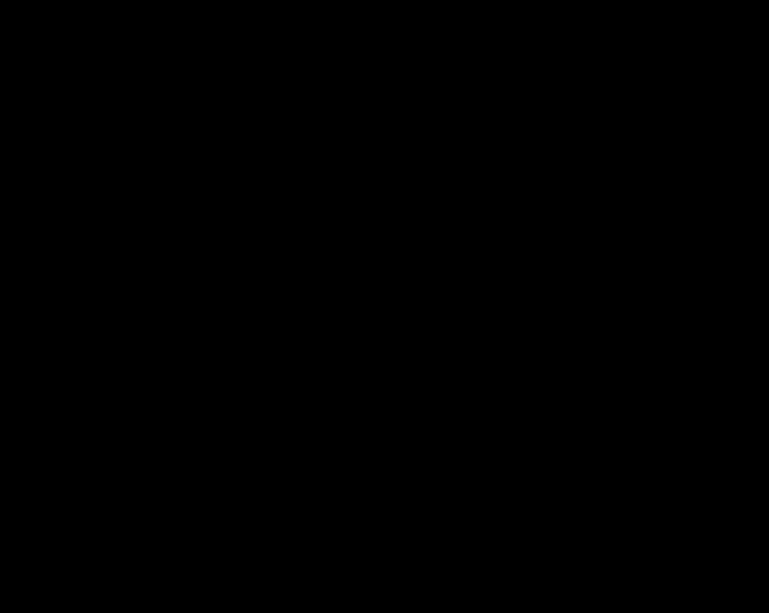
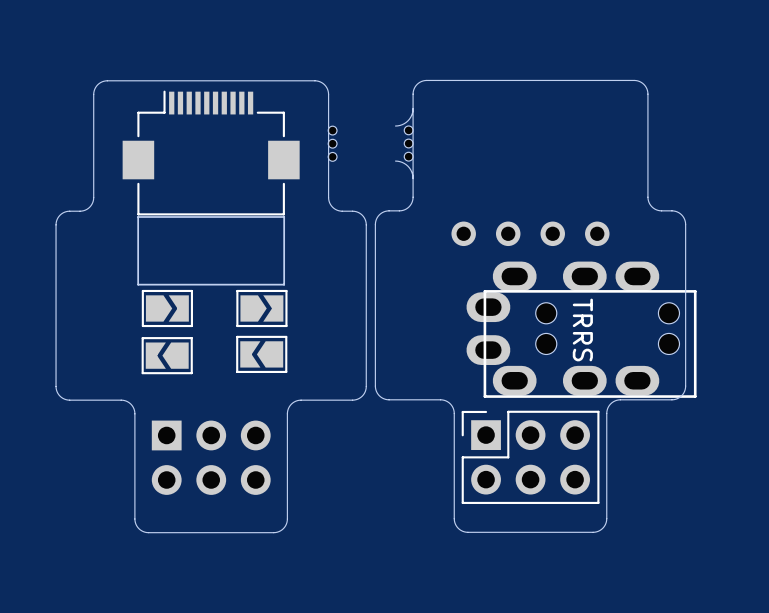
board edge: none -> (314, 80) (107, 80) (99, 83) (94, 89) (93, 201) (85, 210) (62, 213) (56, 223) (56, 388) (60, 396) (66, 399) (123, 400) (133, 406) (134, 413) (135, 520) (137, 527) (143, 531) (273, 532) (280, 530) (287, 520) (287, 413) (289, 406) (299, 400) (356, 399) (365, 391) (366, 223) (359, 213) (337, 210) (329, 202) (328, 92) (323, 83) (314, 80)
board edge: none -> (634, 80) (426, 80) (419, 82) (414, 88) (412, 200) (404, 209) (382, 212) (375, 222) (375, 387) (379, 395) (385, 399) (442, 399) (452, 406) (454, 413) (454, 520) (457, 526) (462, 531) (593, 532) (599, 530) (606, 520) (606, 413) (608, 406) (618, 399) (675, 399) (684, 391) (685, 222) (678, 212) (656, 209) (648, 202) (647, 92) (642, 83) (634, 80)
board edge: none -> (413, 108) (407, 120) (395, 126)
part: none -> (332, 143)
part: none -> (408, 143)
part: none -> (211, 153)
board edge: none -> (395, 161) (407, 166) (413, 178)
board edge: none -> (284, 216) (138, 216) (138, 284) (284, 284) (284, 216)
part: none -> (530, 233)
part: none -> (167, 308)
part: none -> (261, 308)
part: none -> (581, 329)
part: none -> (261, 354)
part: none -> (167, 355)
part: none -> (211, 457)
part: none -> (530, 457)

